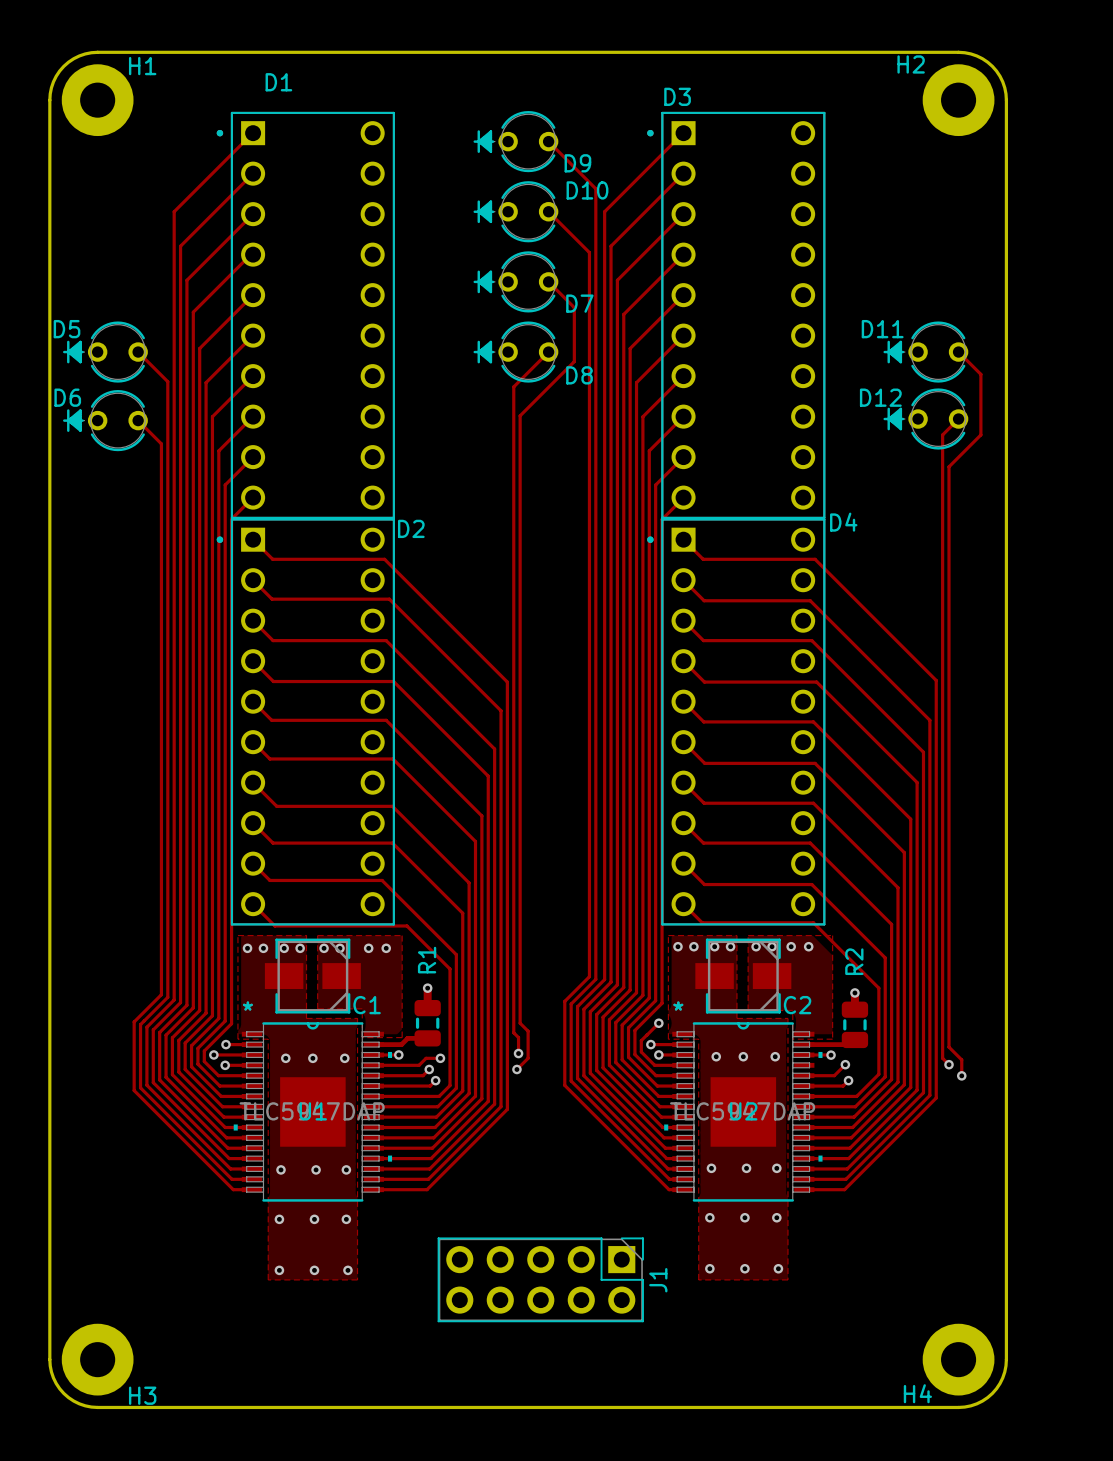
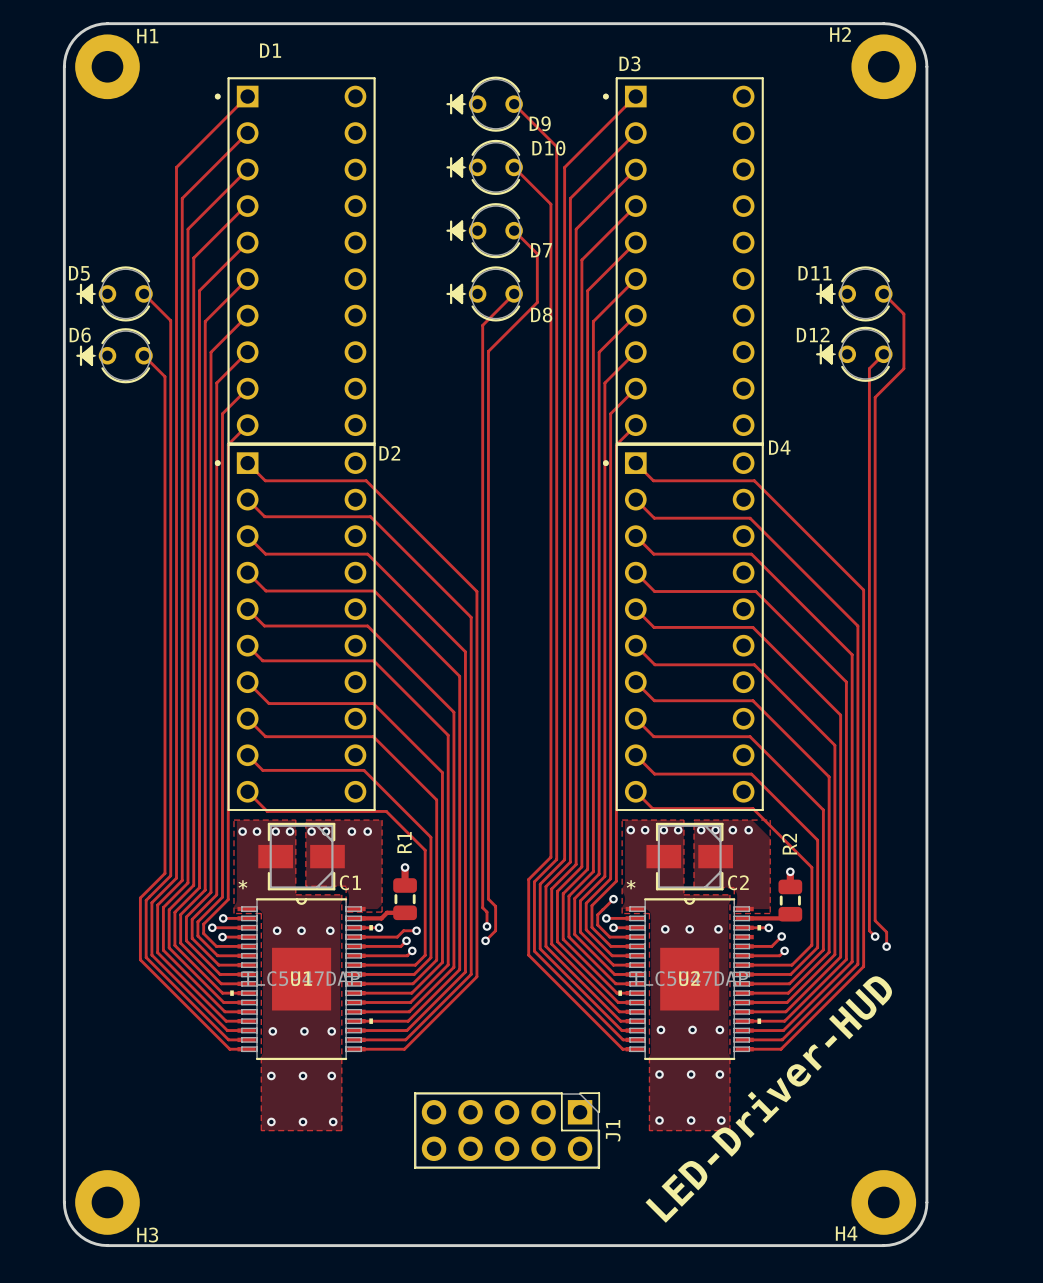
text: none -> LED-Driver-HUD (768, 1099)

